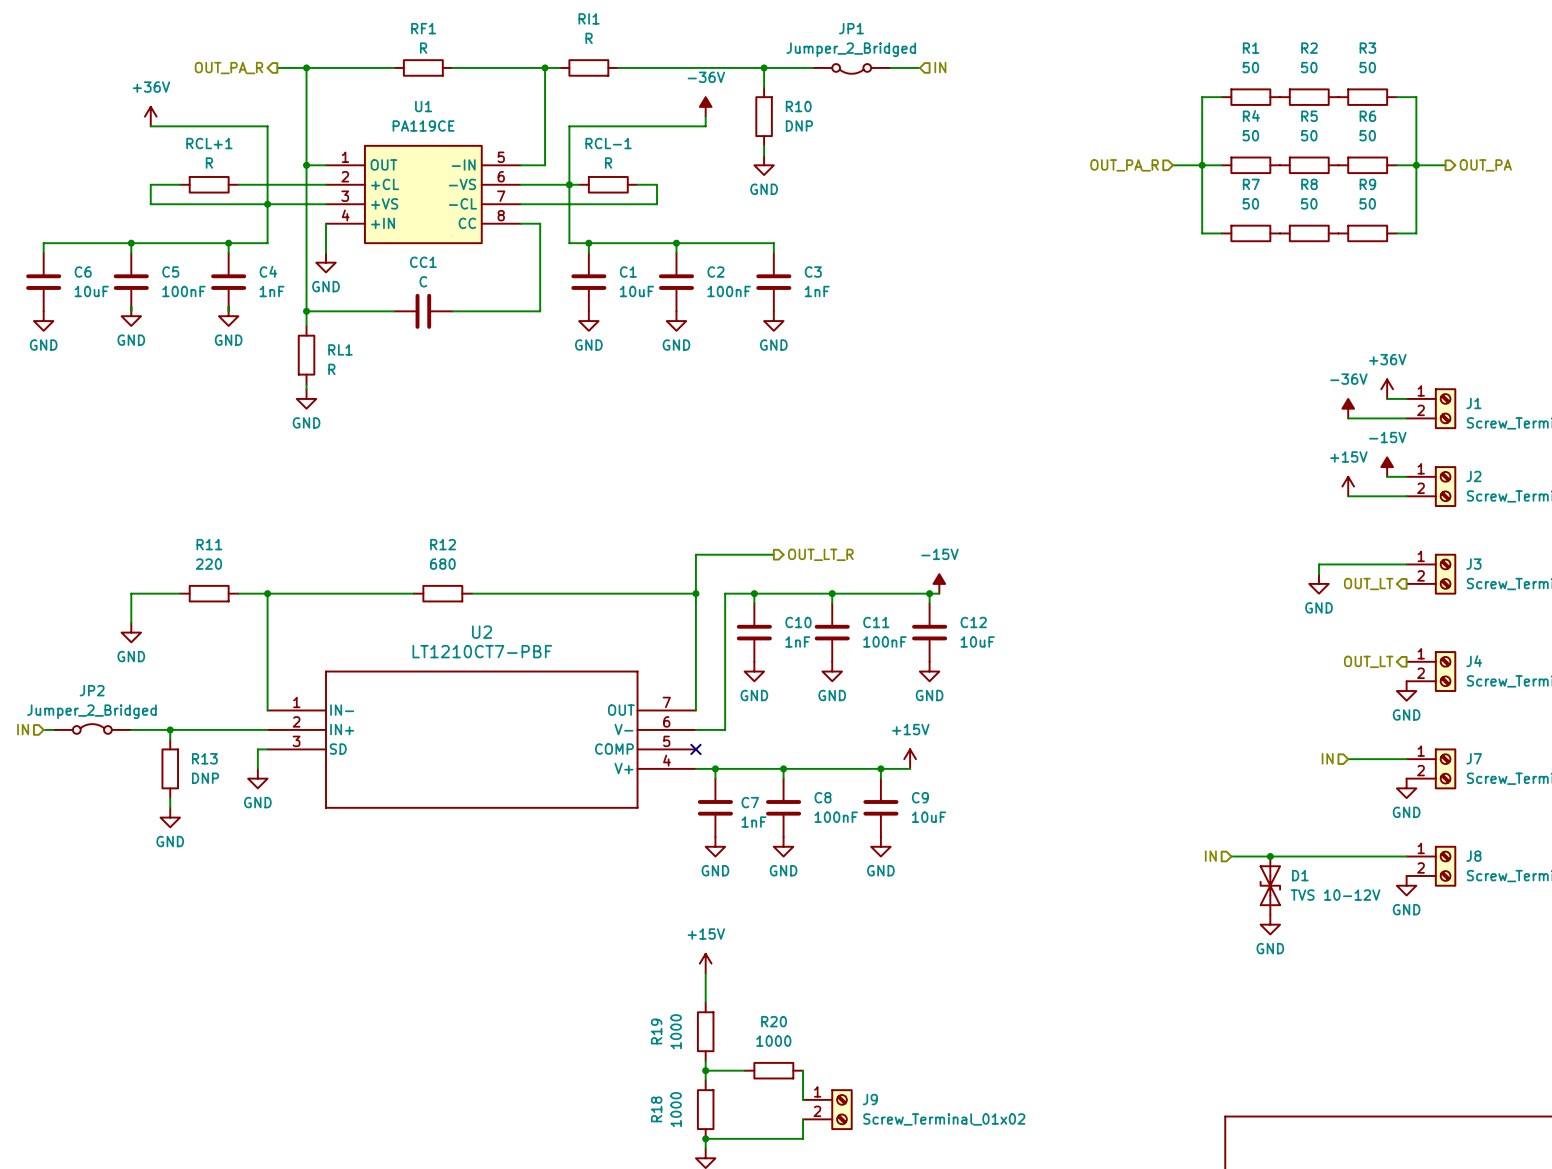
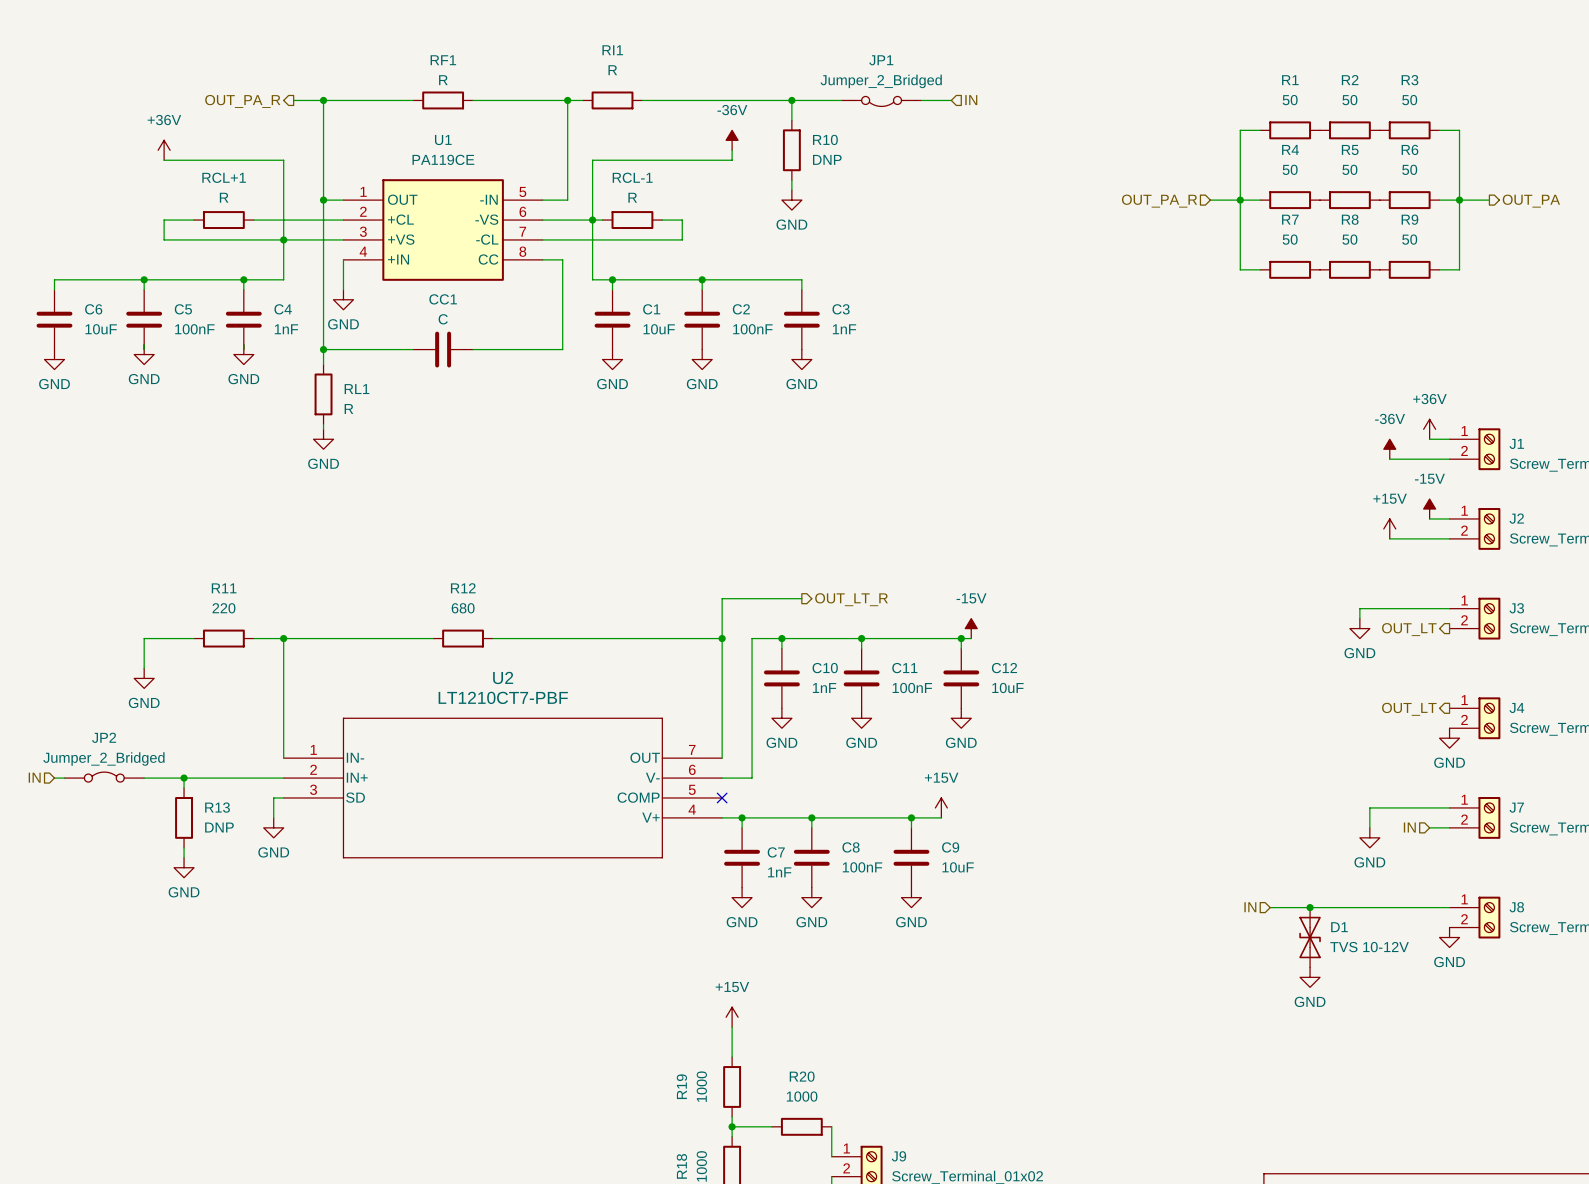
hierarchical label position: IN (1327, 758) -> IN (1409, 827)
wire: none -> (1389, 807) (1369, 807) (1369, 827)
wire: none -> (1429, 827) (1449, 827)
power symbol position: GND (1406, 788) -> GND (1369, 837)

